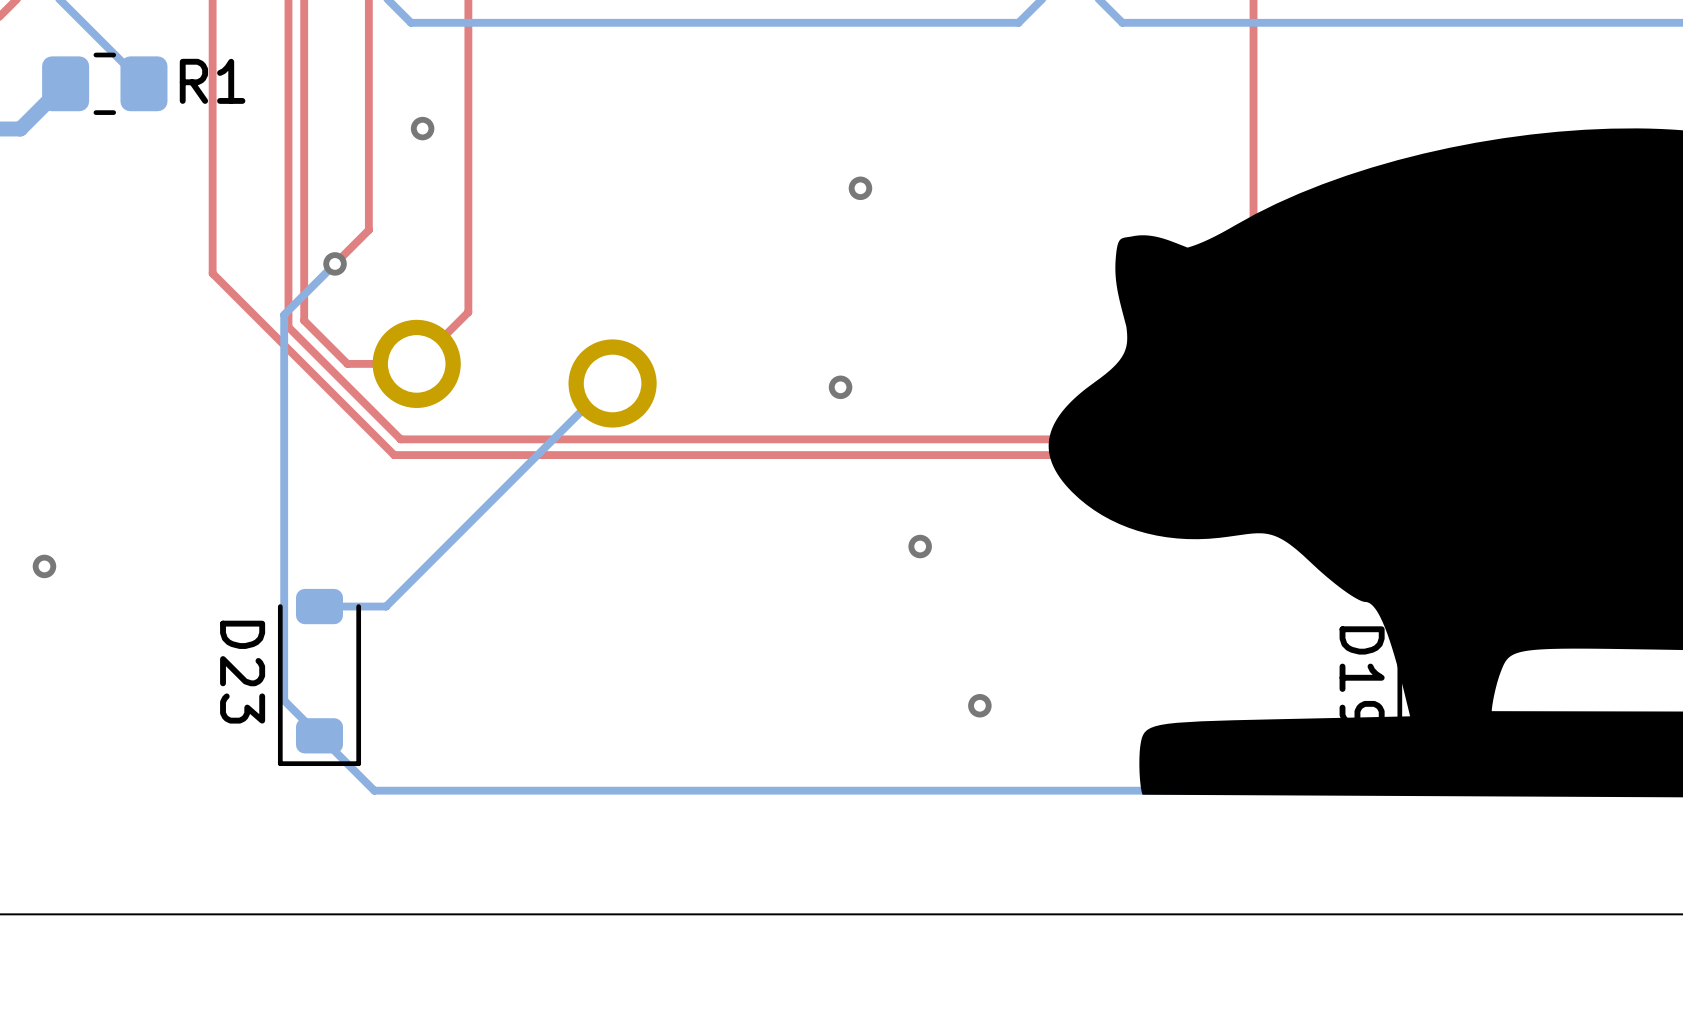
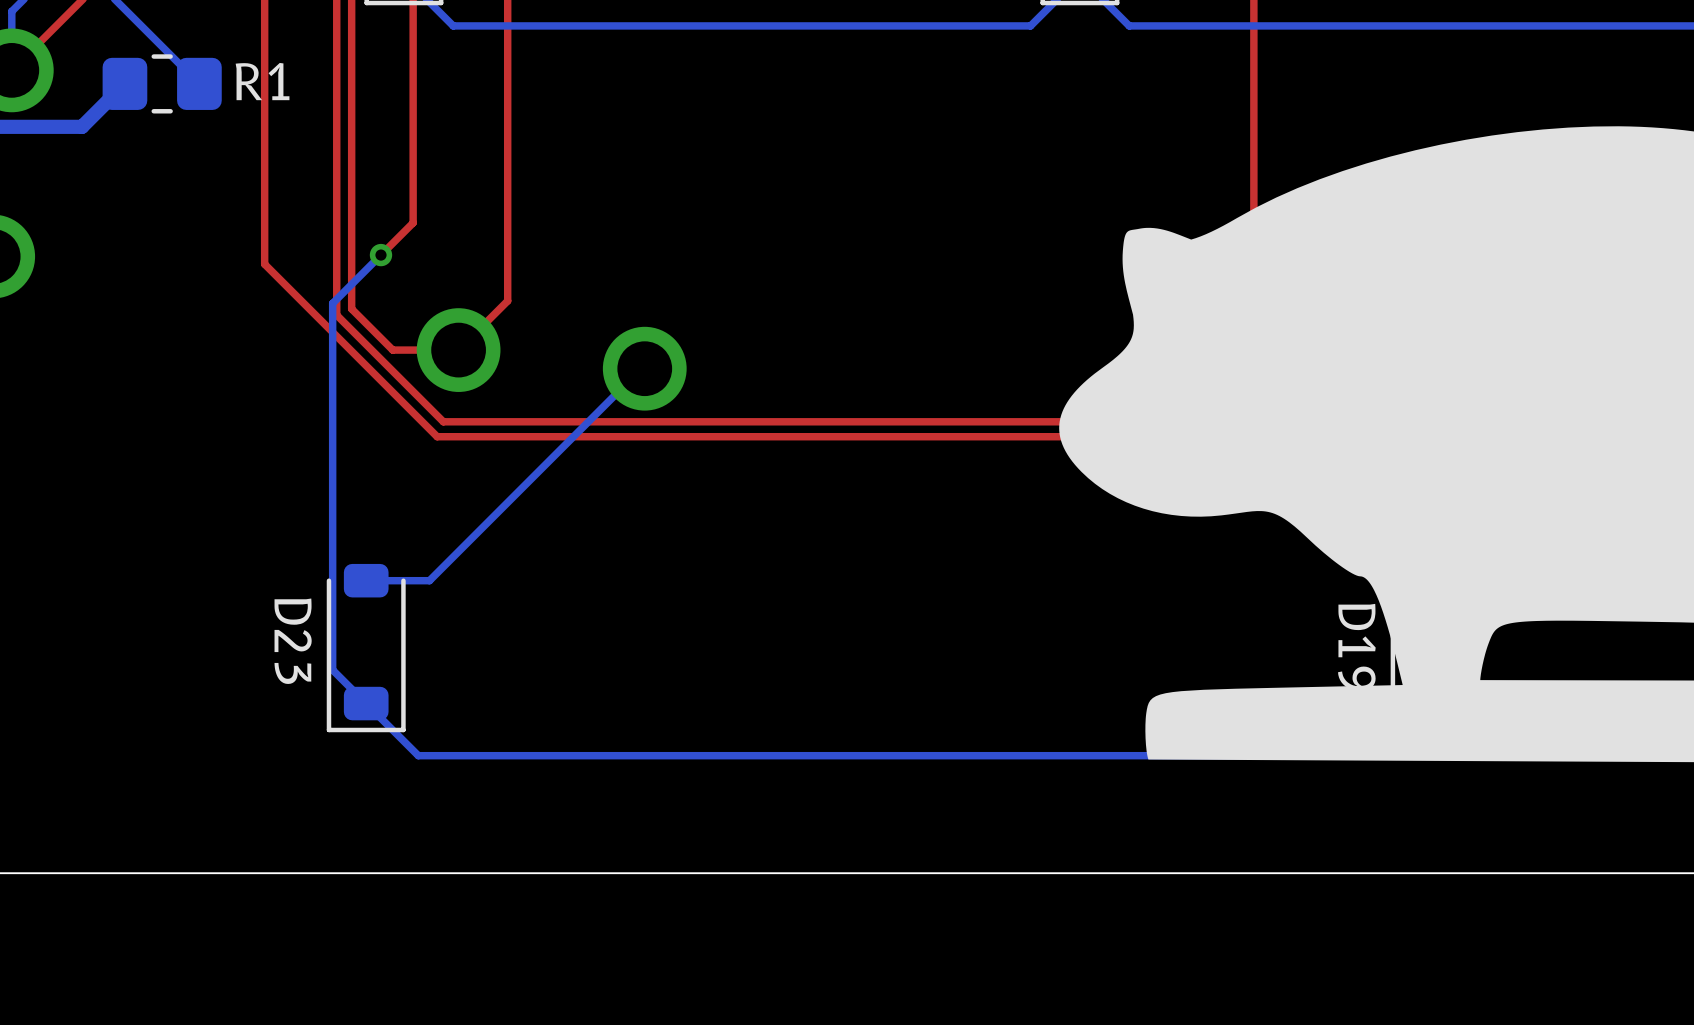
via: (422, 128) -> none
via: (860, 188) -> none
via: (840, 387) -> none
via: (920, 546) -> none
via: (44, 566) -> none
via: (979, 705) -> none

